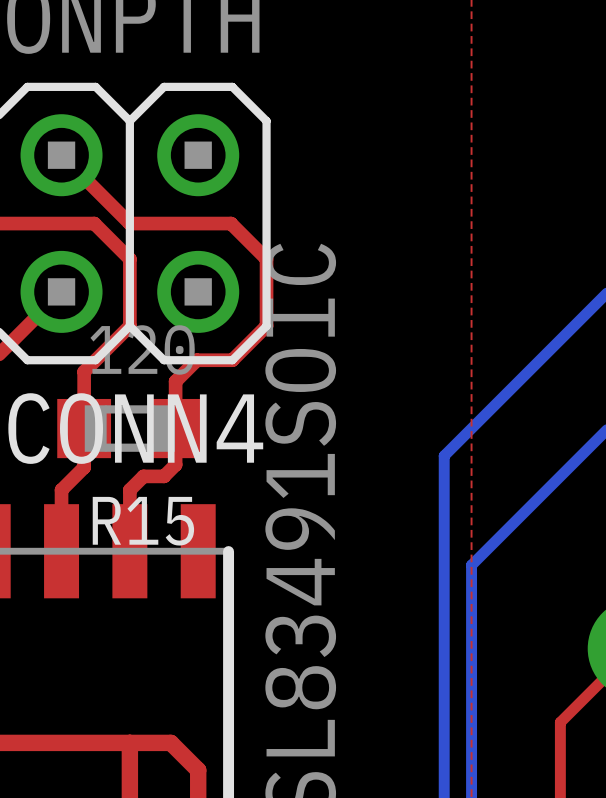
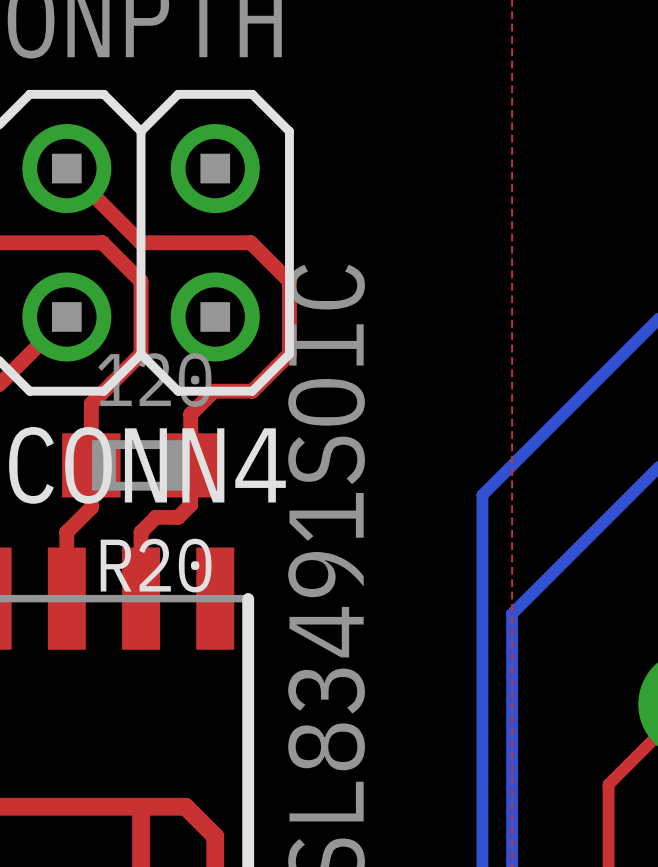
R15 name: R15 (143, 521) -> R20 (156, 565)

